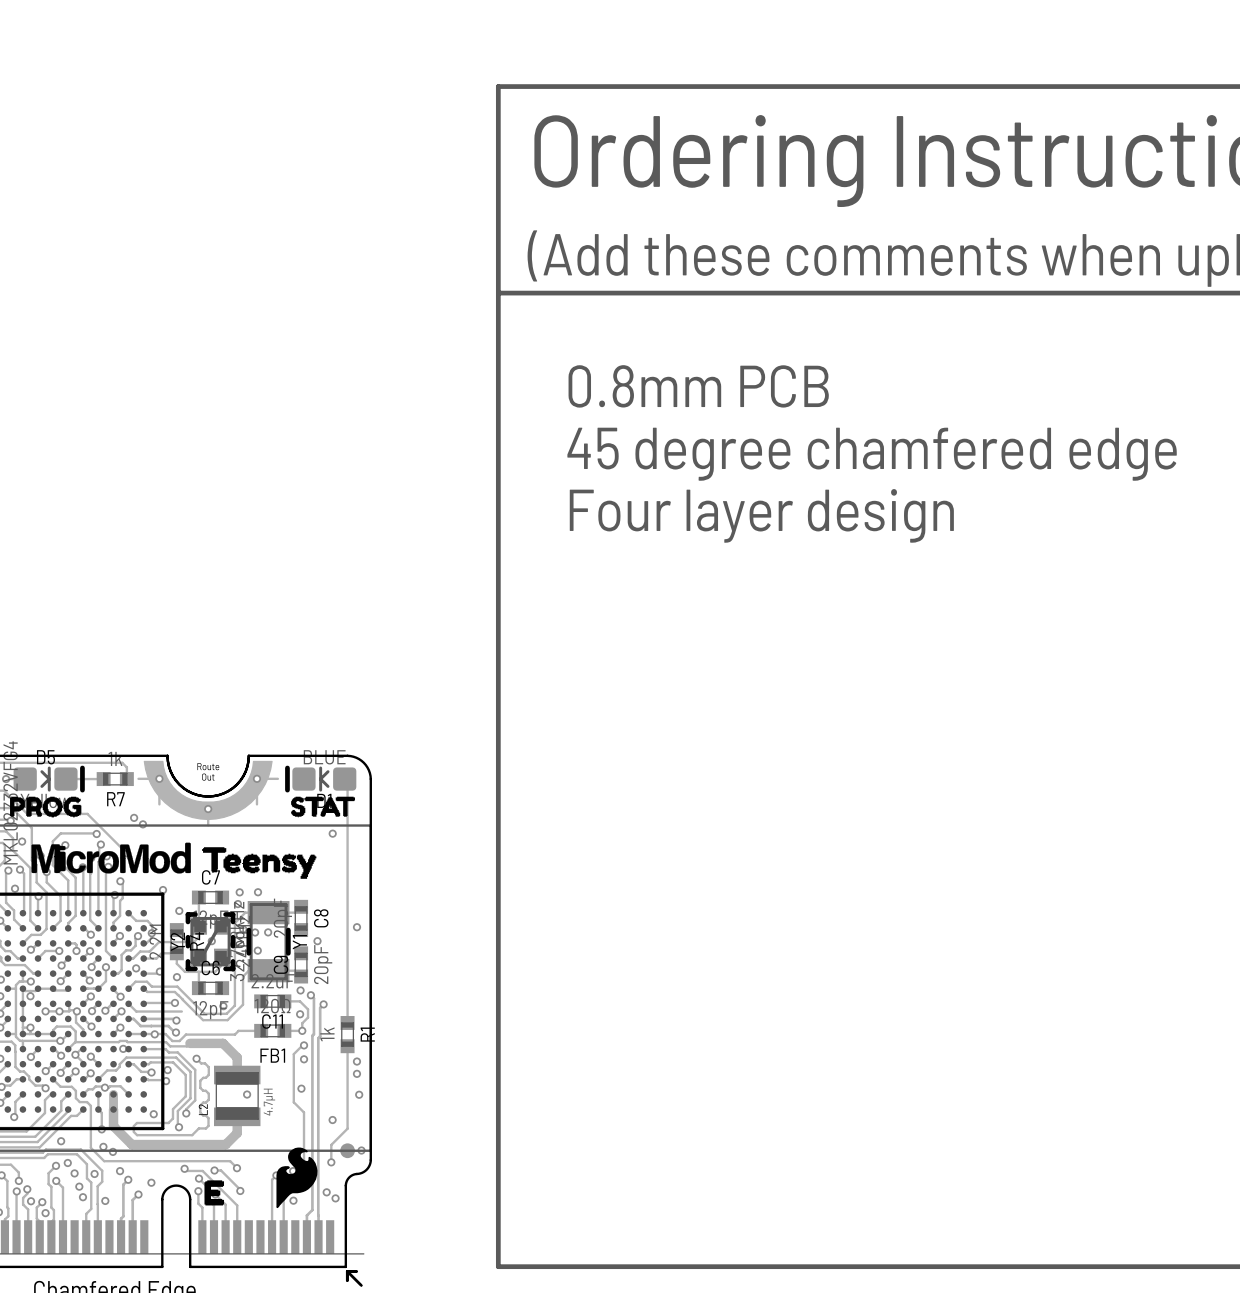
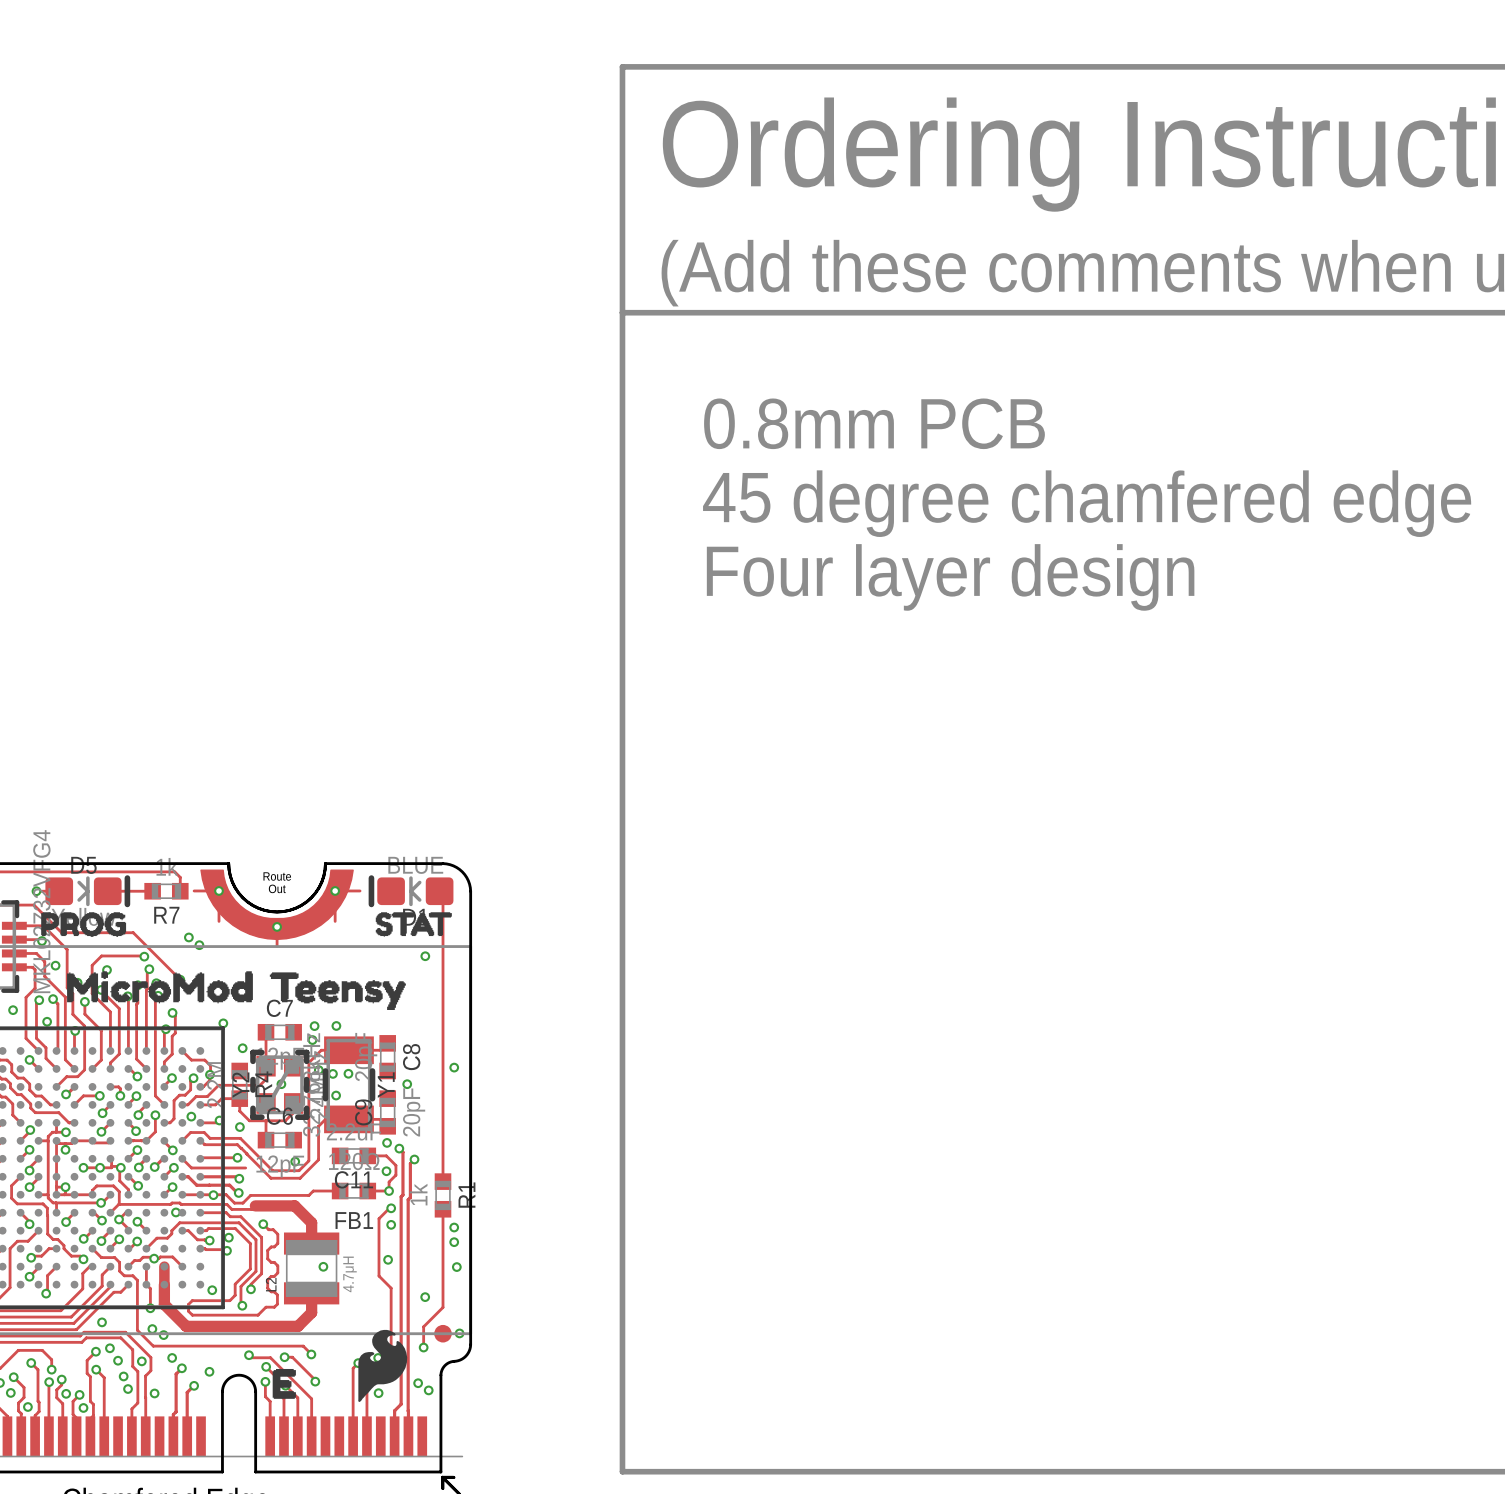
drawing shape: [31, 842, 191, 874] -> [67, 971, 253, 1004]

